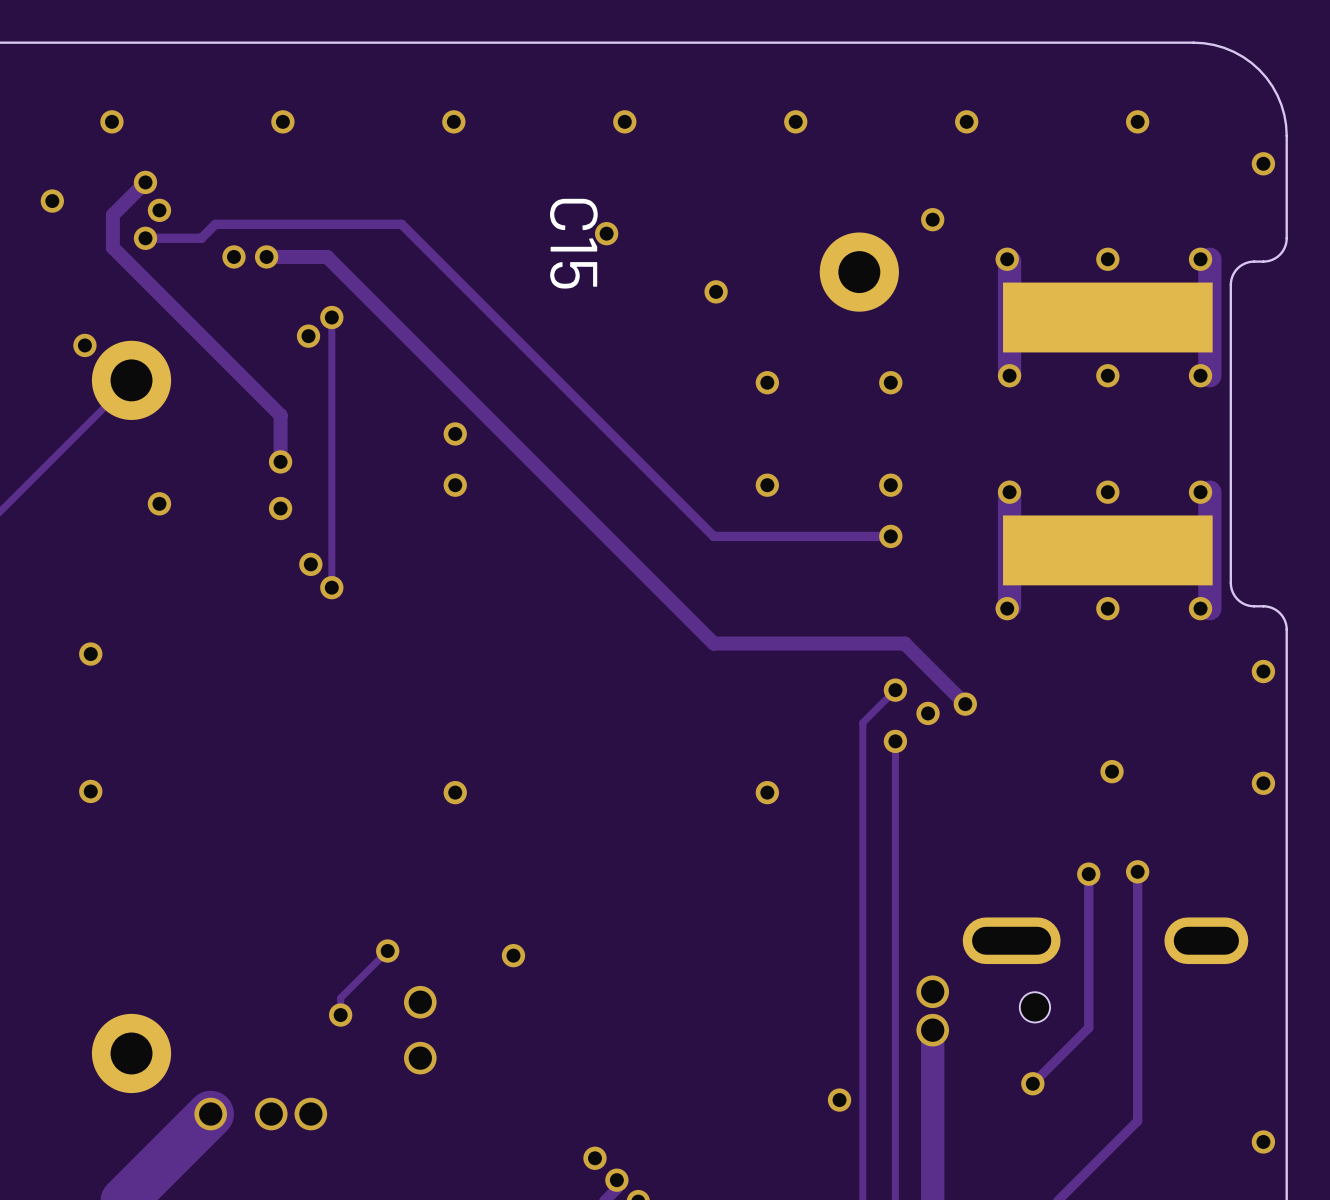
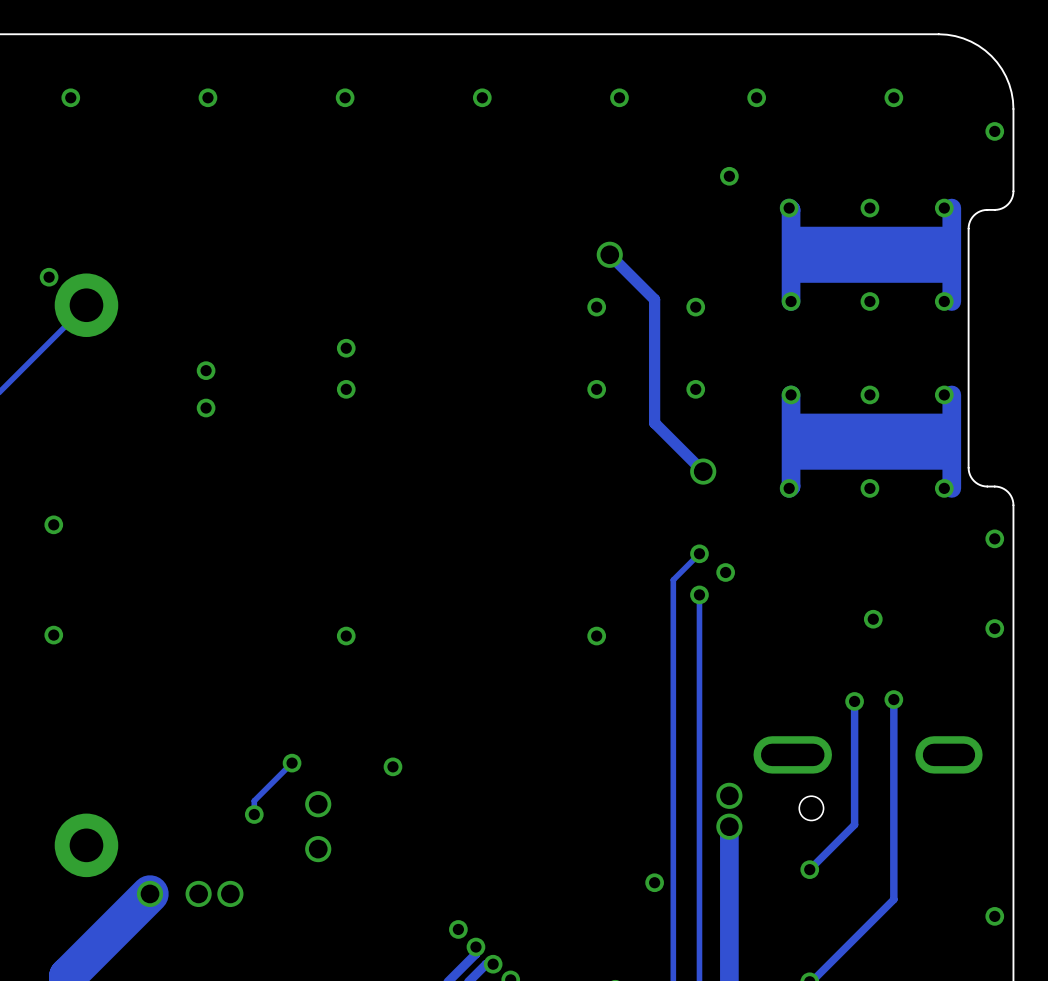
track: (145, 182) (112, 215) (112, 247) (280, 415) (280, 461) -> none
via: (145, 182) -> none
via: (52, 201) -> none
via: (159, 210) -> none
via: (606, 233) -> none
track: (145, 238) (201, 238) (215, 224) (401, 224) (713, 536) (890, 536) -> none
via: (145, 238) -> none
C15: (573, 243) -> none
via: (233, 256) -> none
track: (266, 256) (327, 256) (713, 643) (904, 643) (965, 704) -> none
via: (266, 256) -> none
part: (859, 272) -> none
via: (716, 291) -> none
track: (331, 317) (331, 587) -> none
via: (331, 317) -> none
track: none -> (609, 254) (654, 299) (654, 422) (703, 471)
via: none -> (609, 254)
via: (308, 336) -> none
via: (159, 503) -> none
via: (890, 536) -> none
via: (310, 564) -> none
via: (331, 587) -> none
via: none -> (703, 471)
via: (965, 704) -> none

